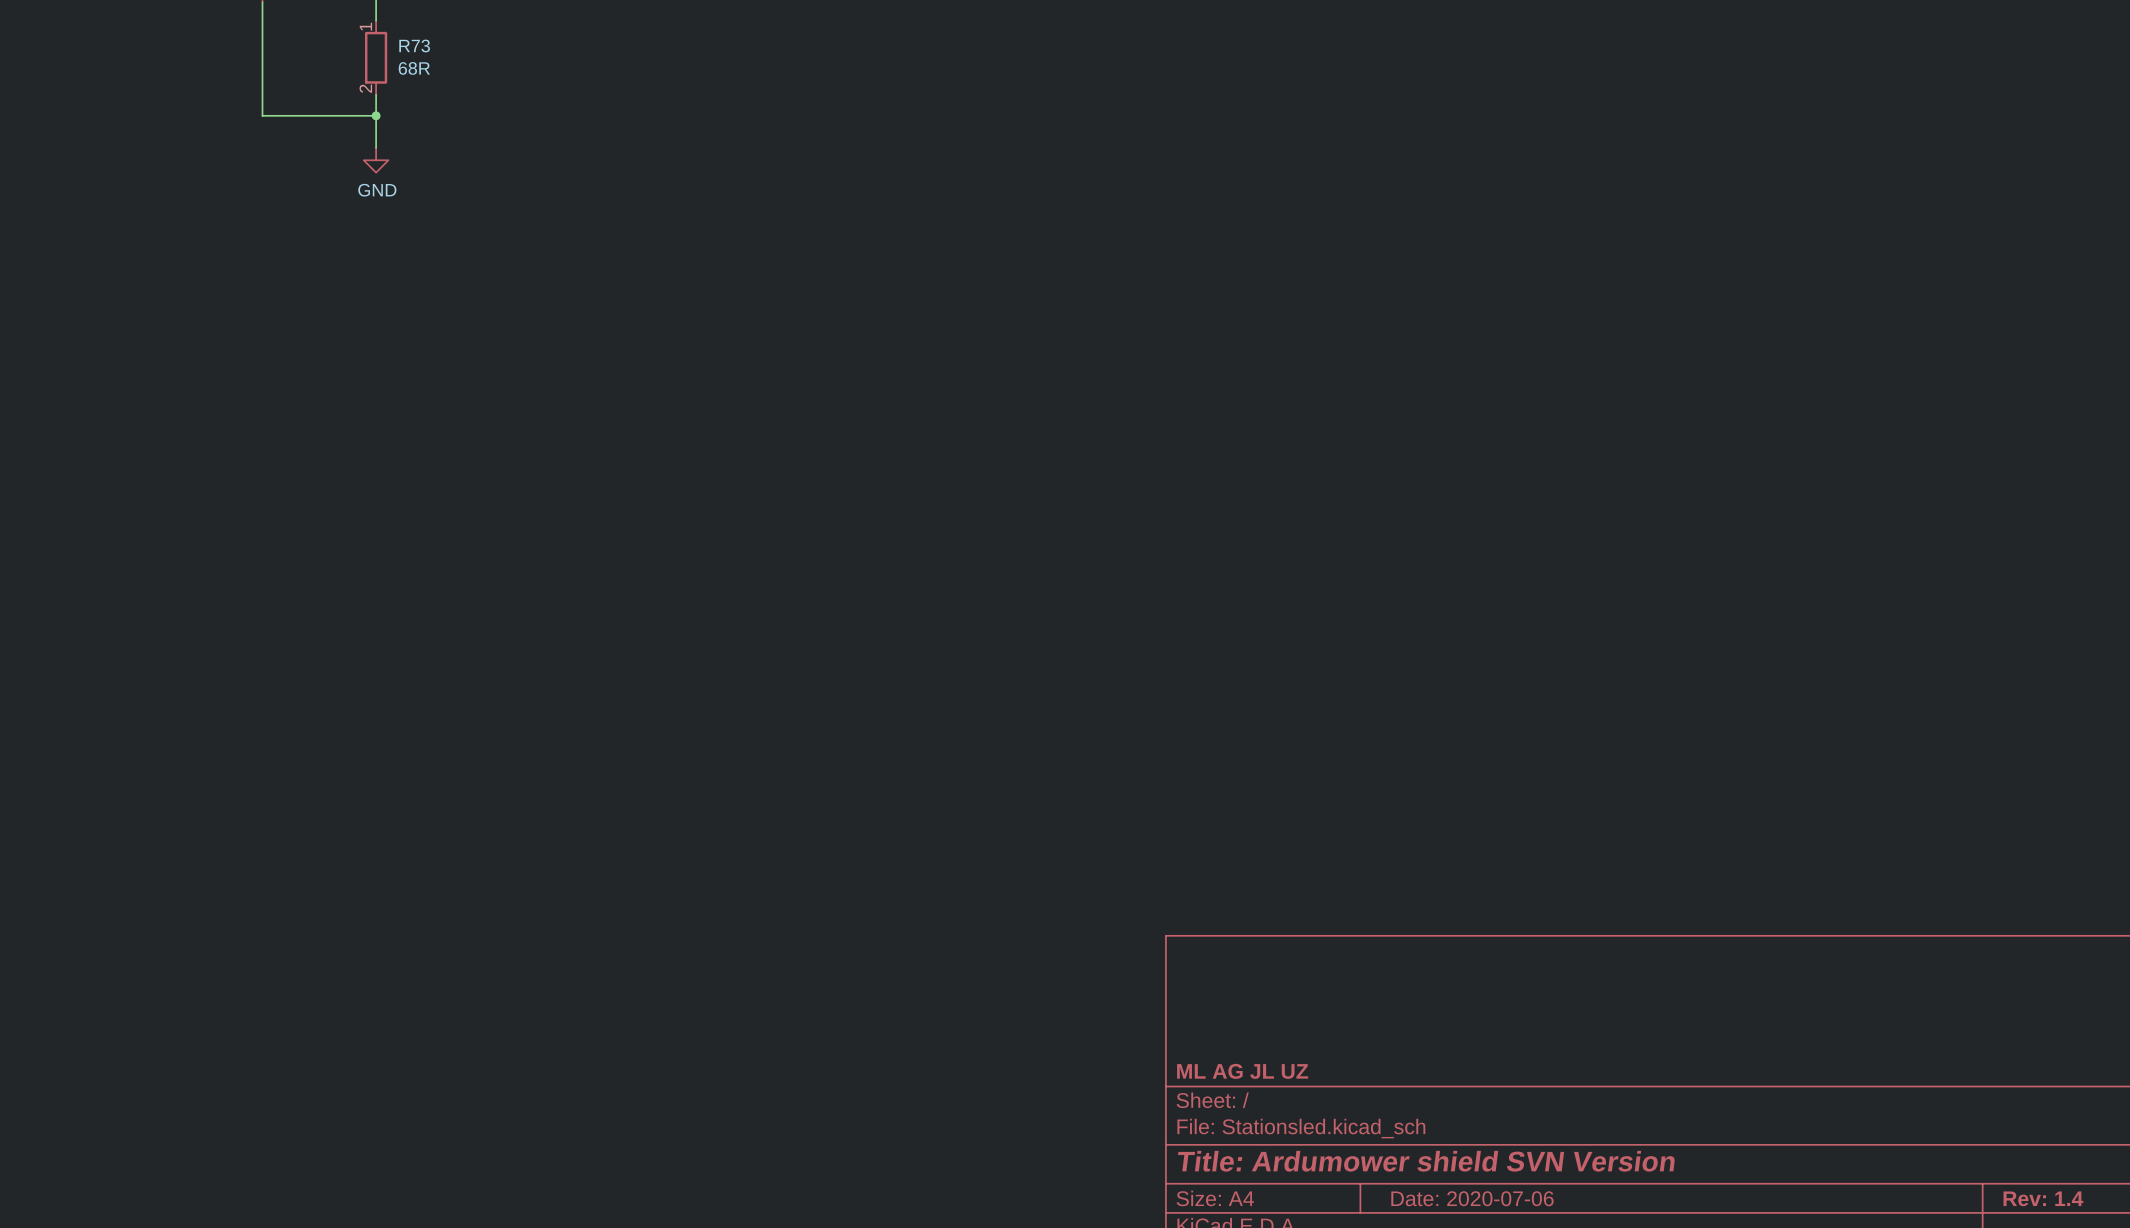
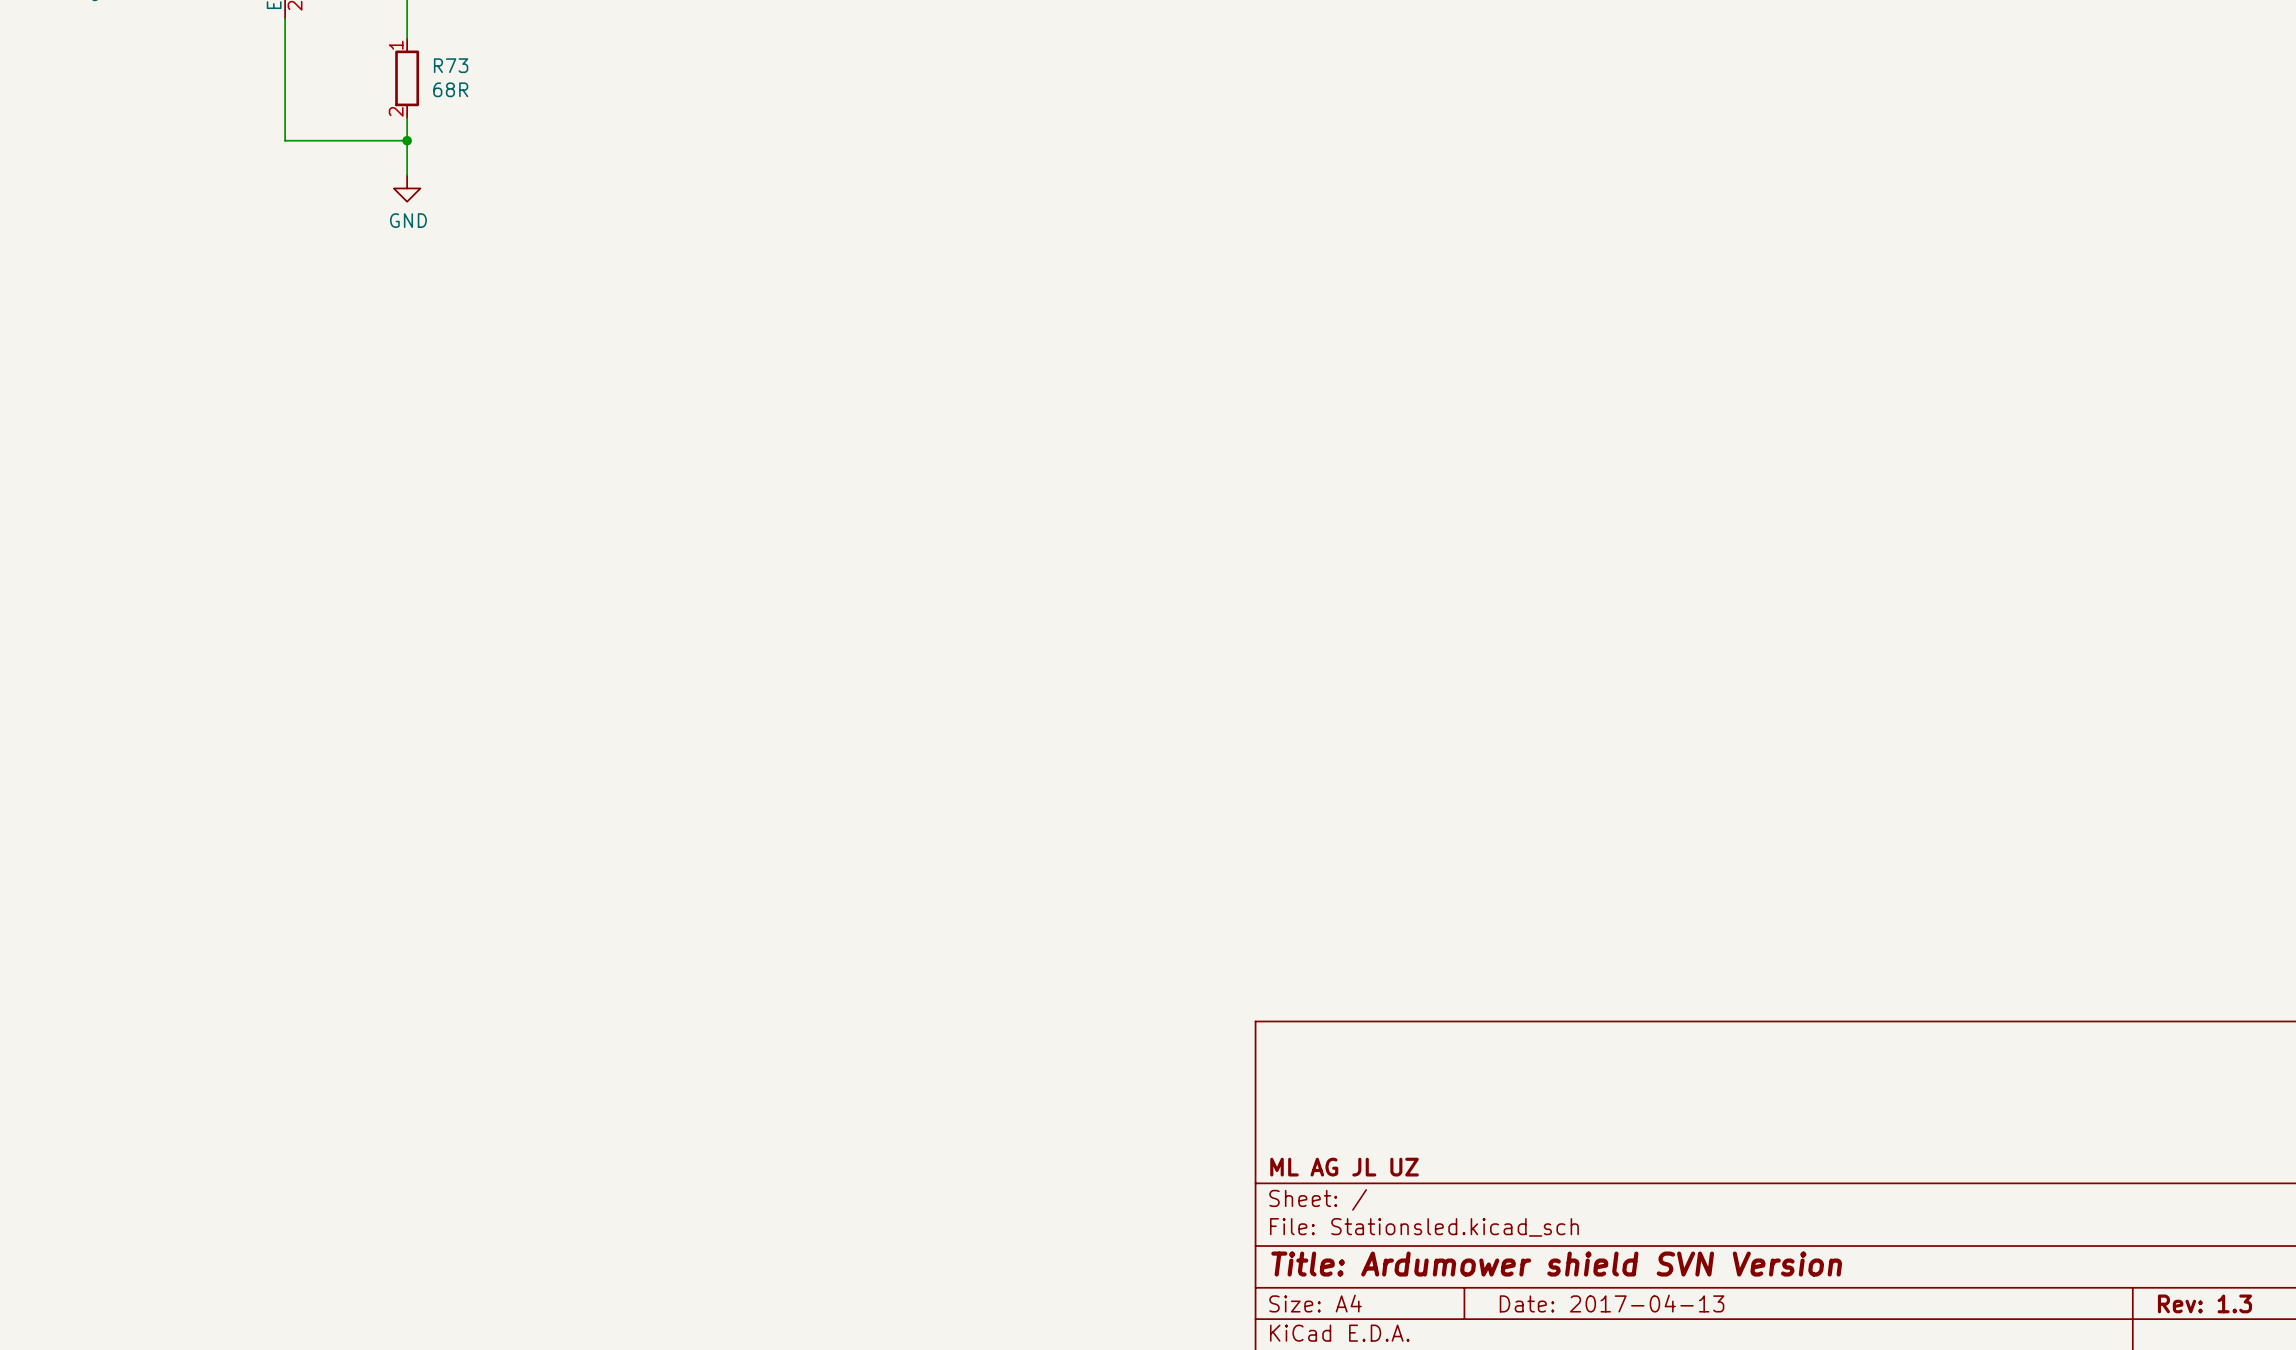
title block: Date: 2020-07-06 (1472, 1198) -> Date: 2017-04-13 (1612, 1303)
title block: Rev: 1.4 (2043, 1198) -> Rev: 1.3 (2204, 1303)

